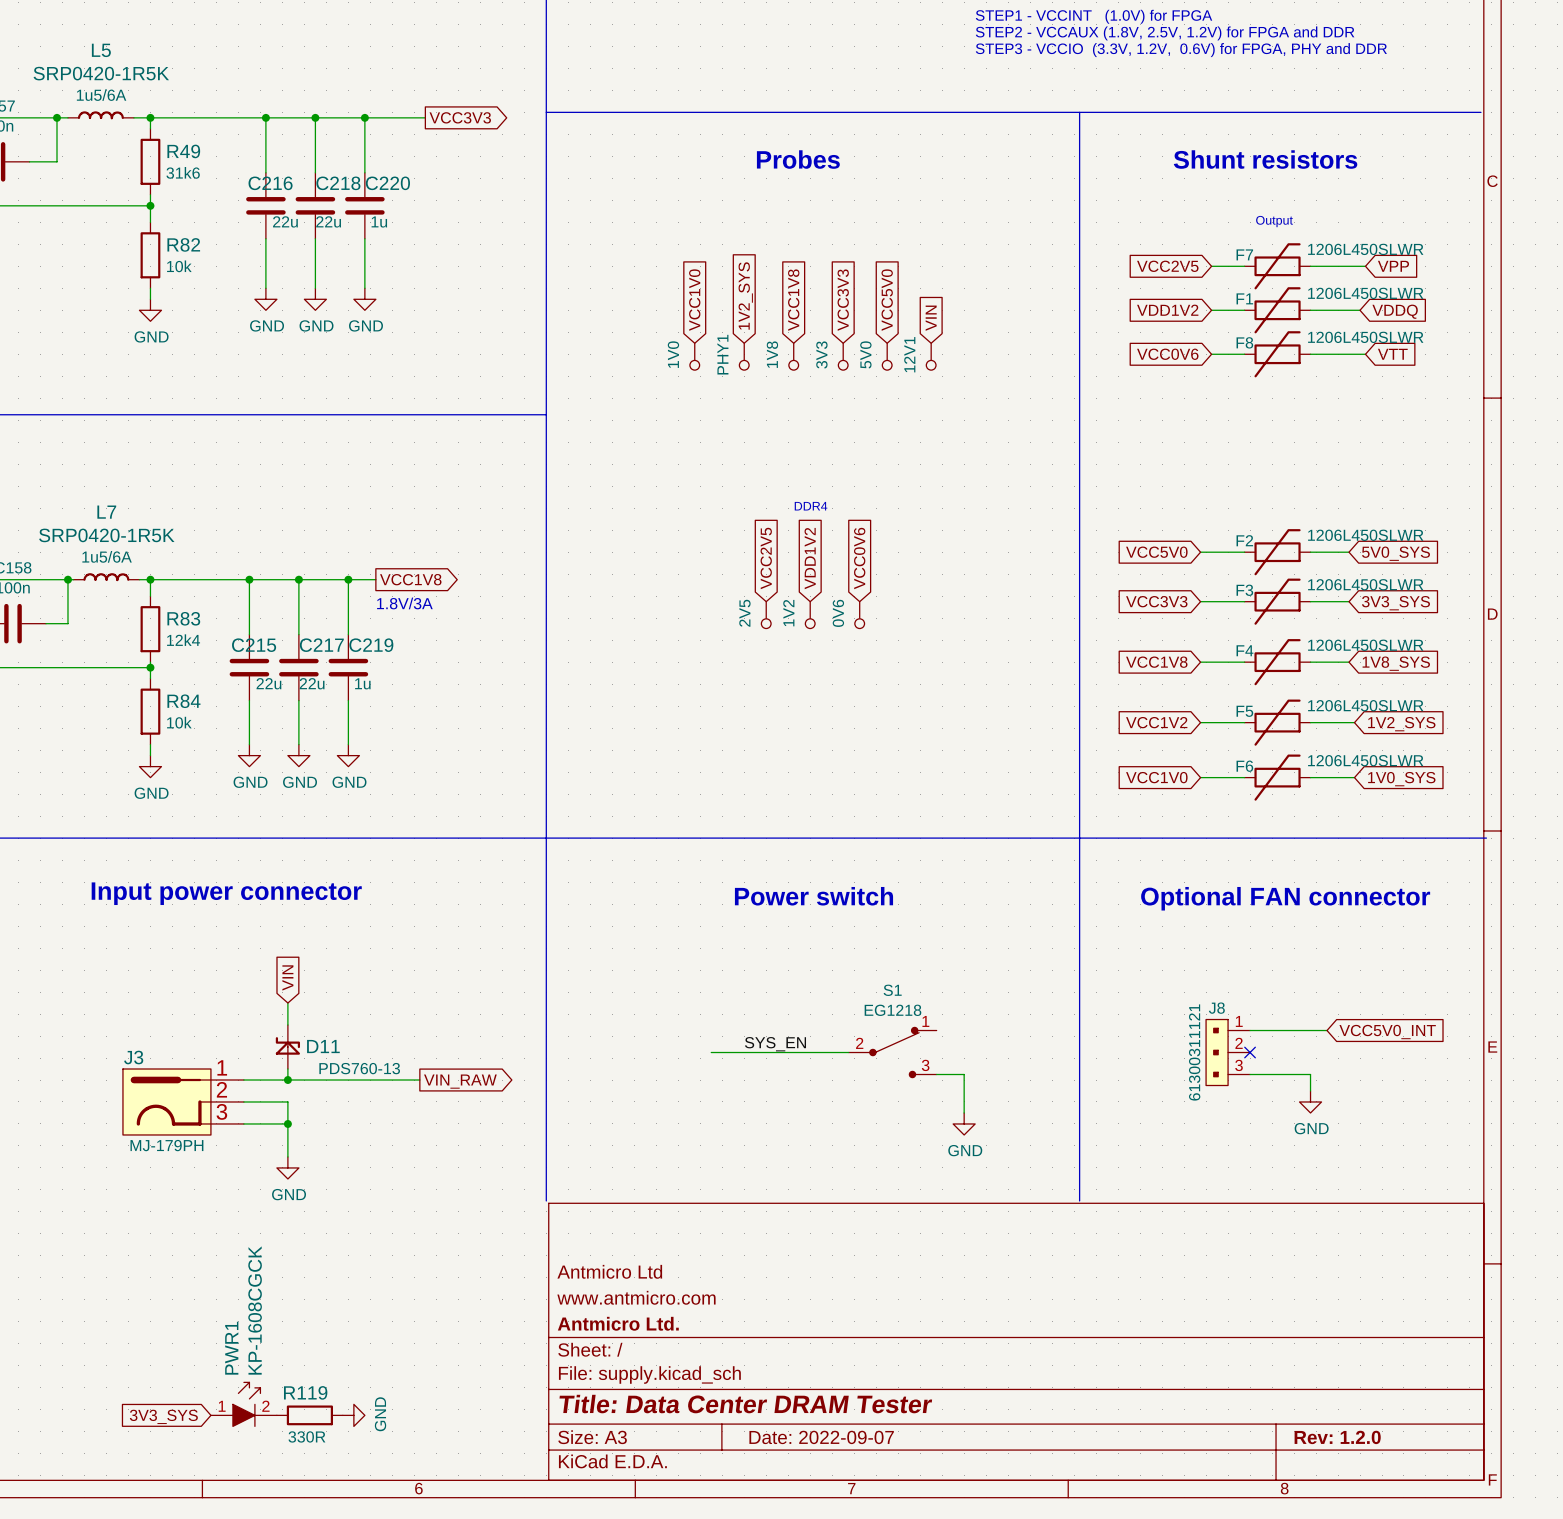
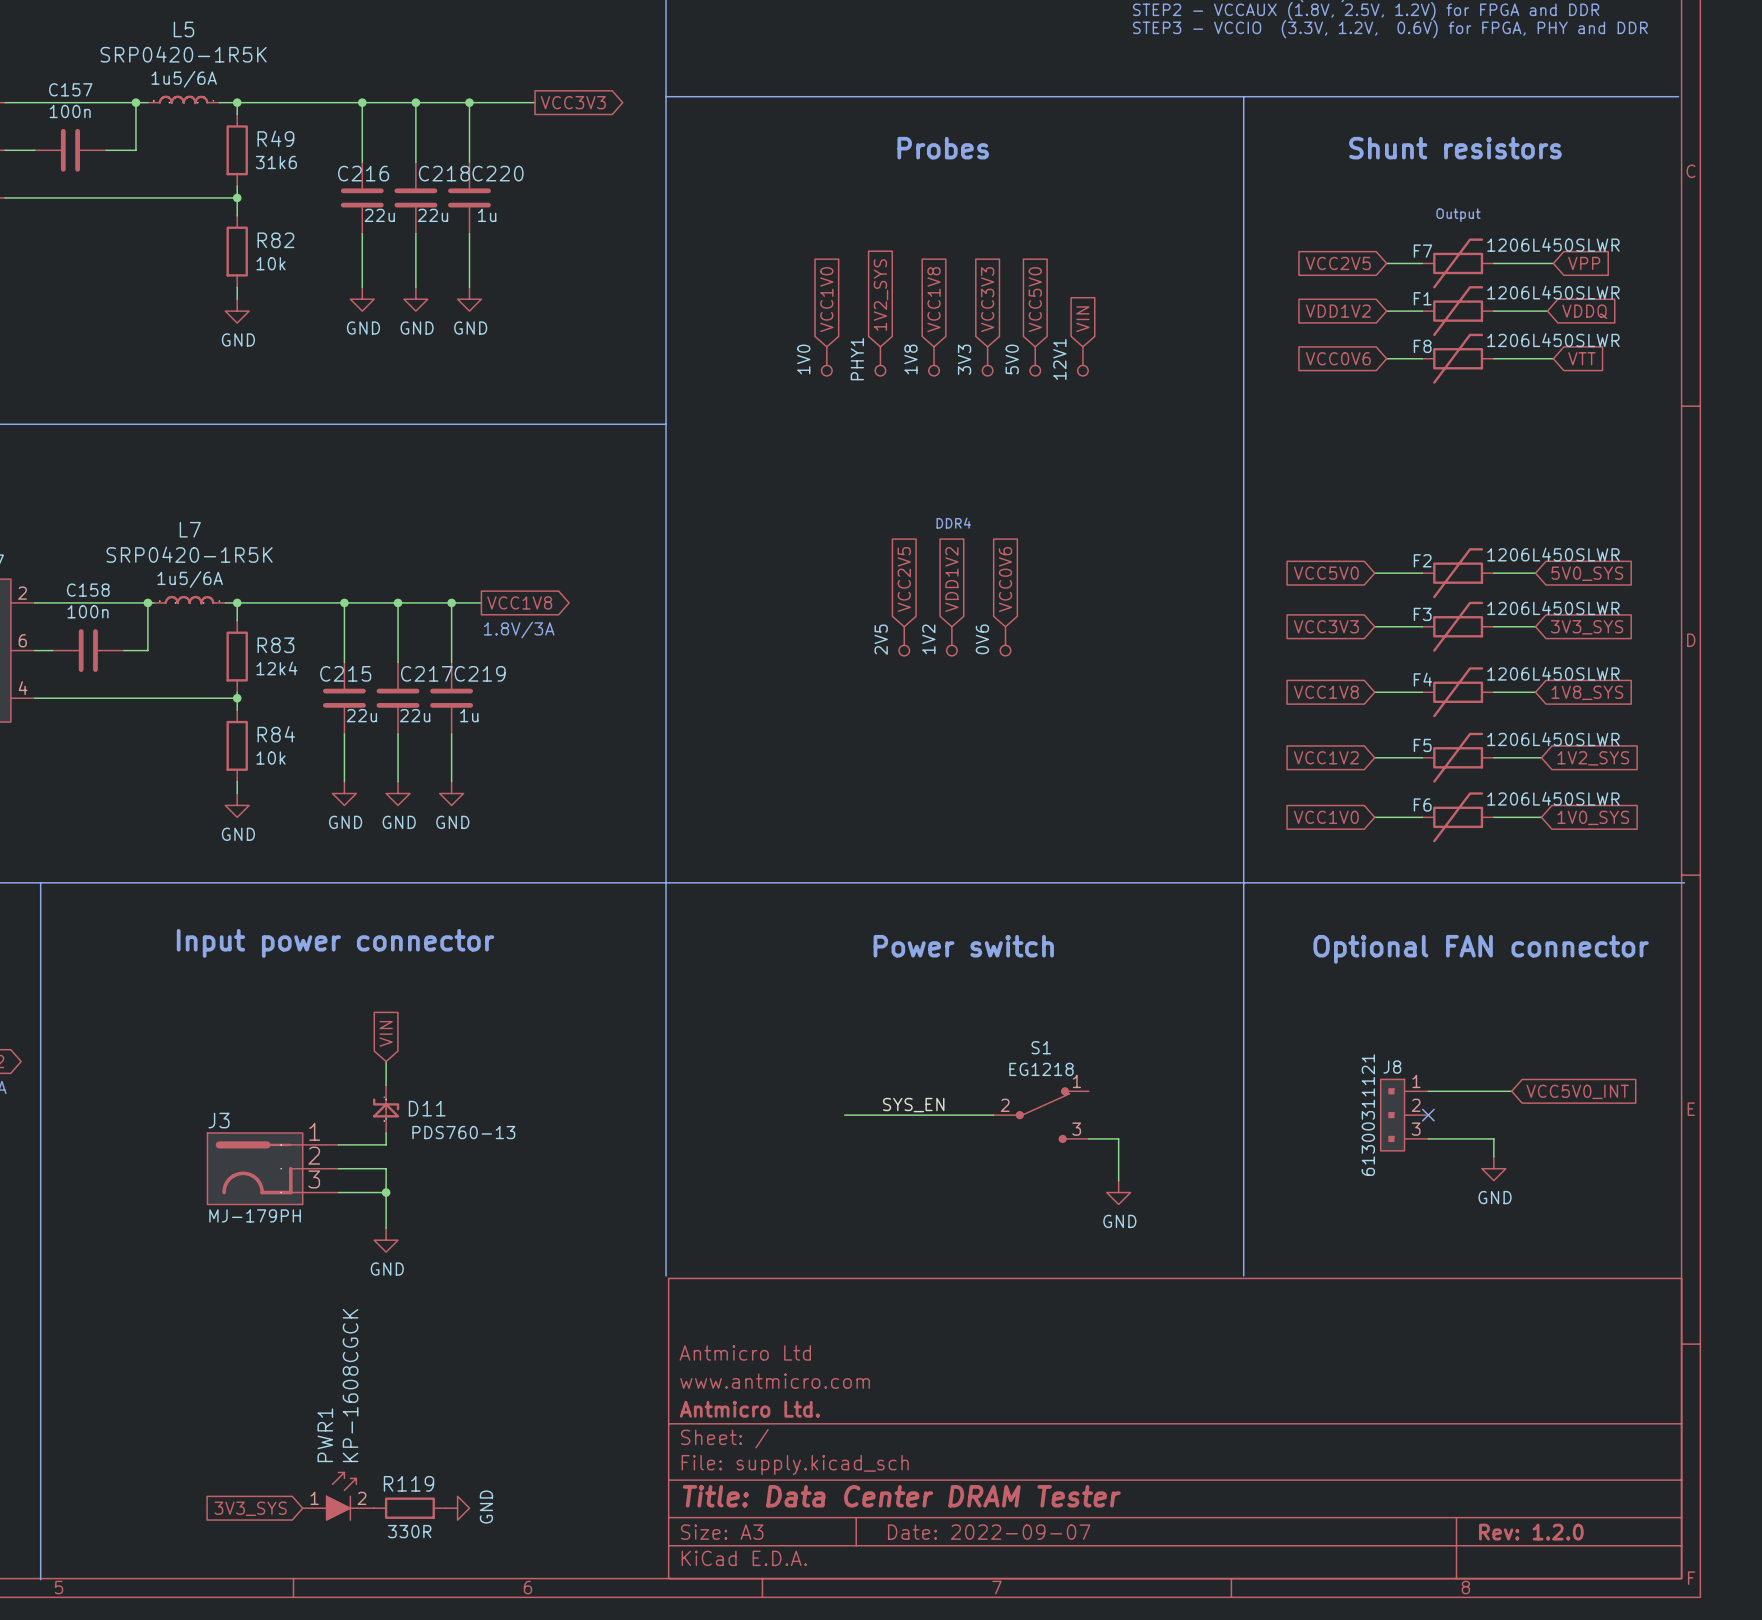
wire: (287, 1080) (419, 1080) -> none
junction: (287, 1080) -> none
global label: VIN_RAW (460, 1081) -> none

